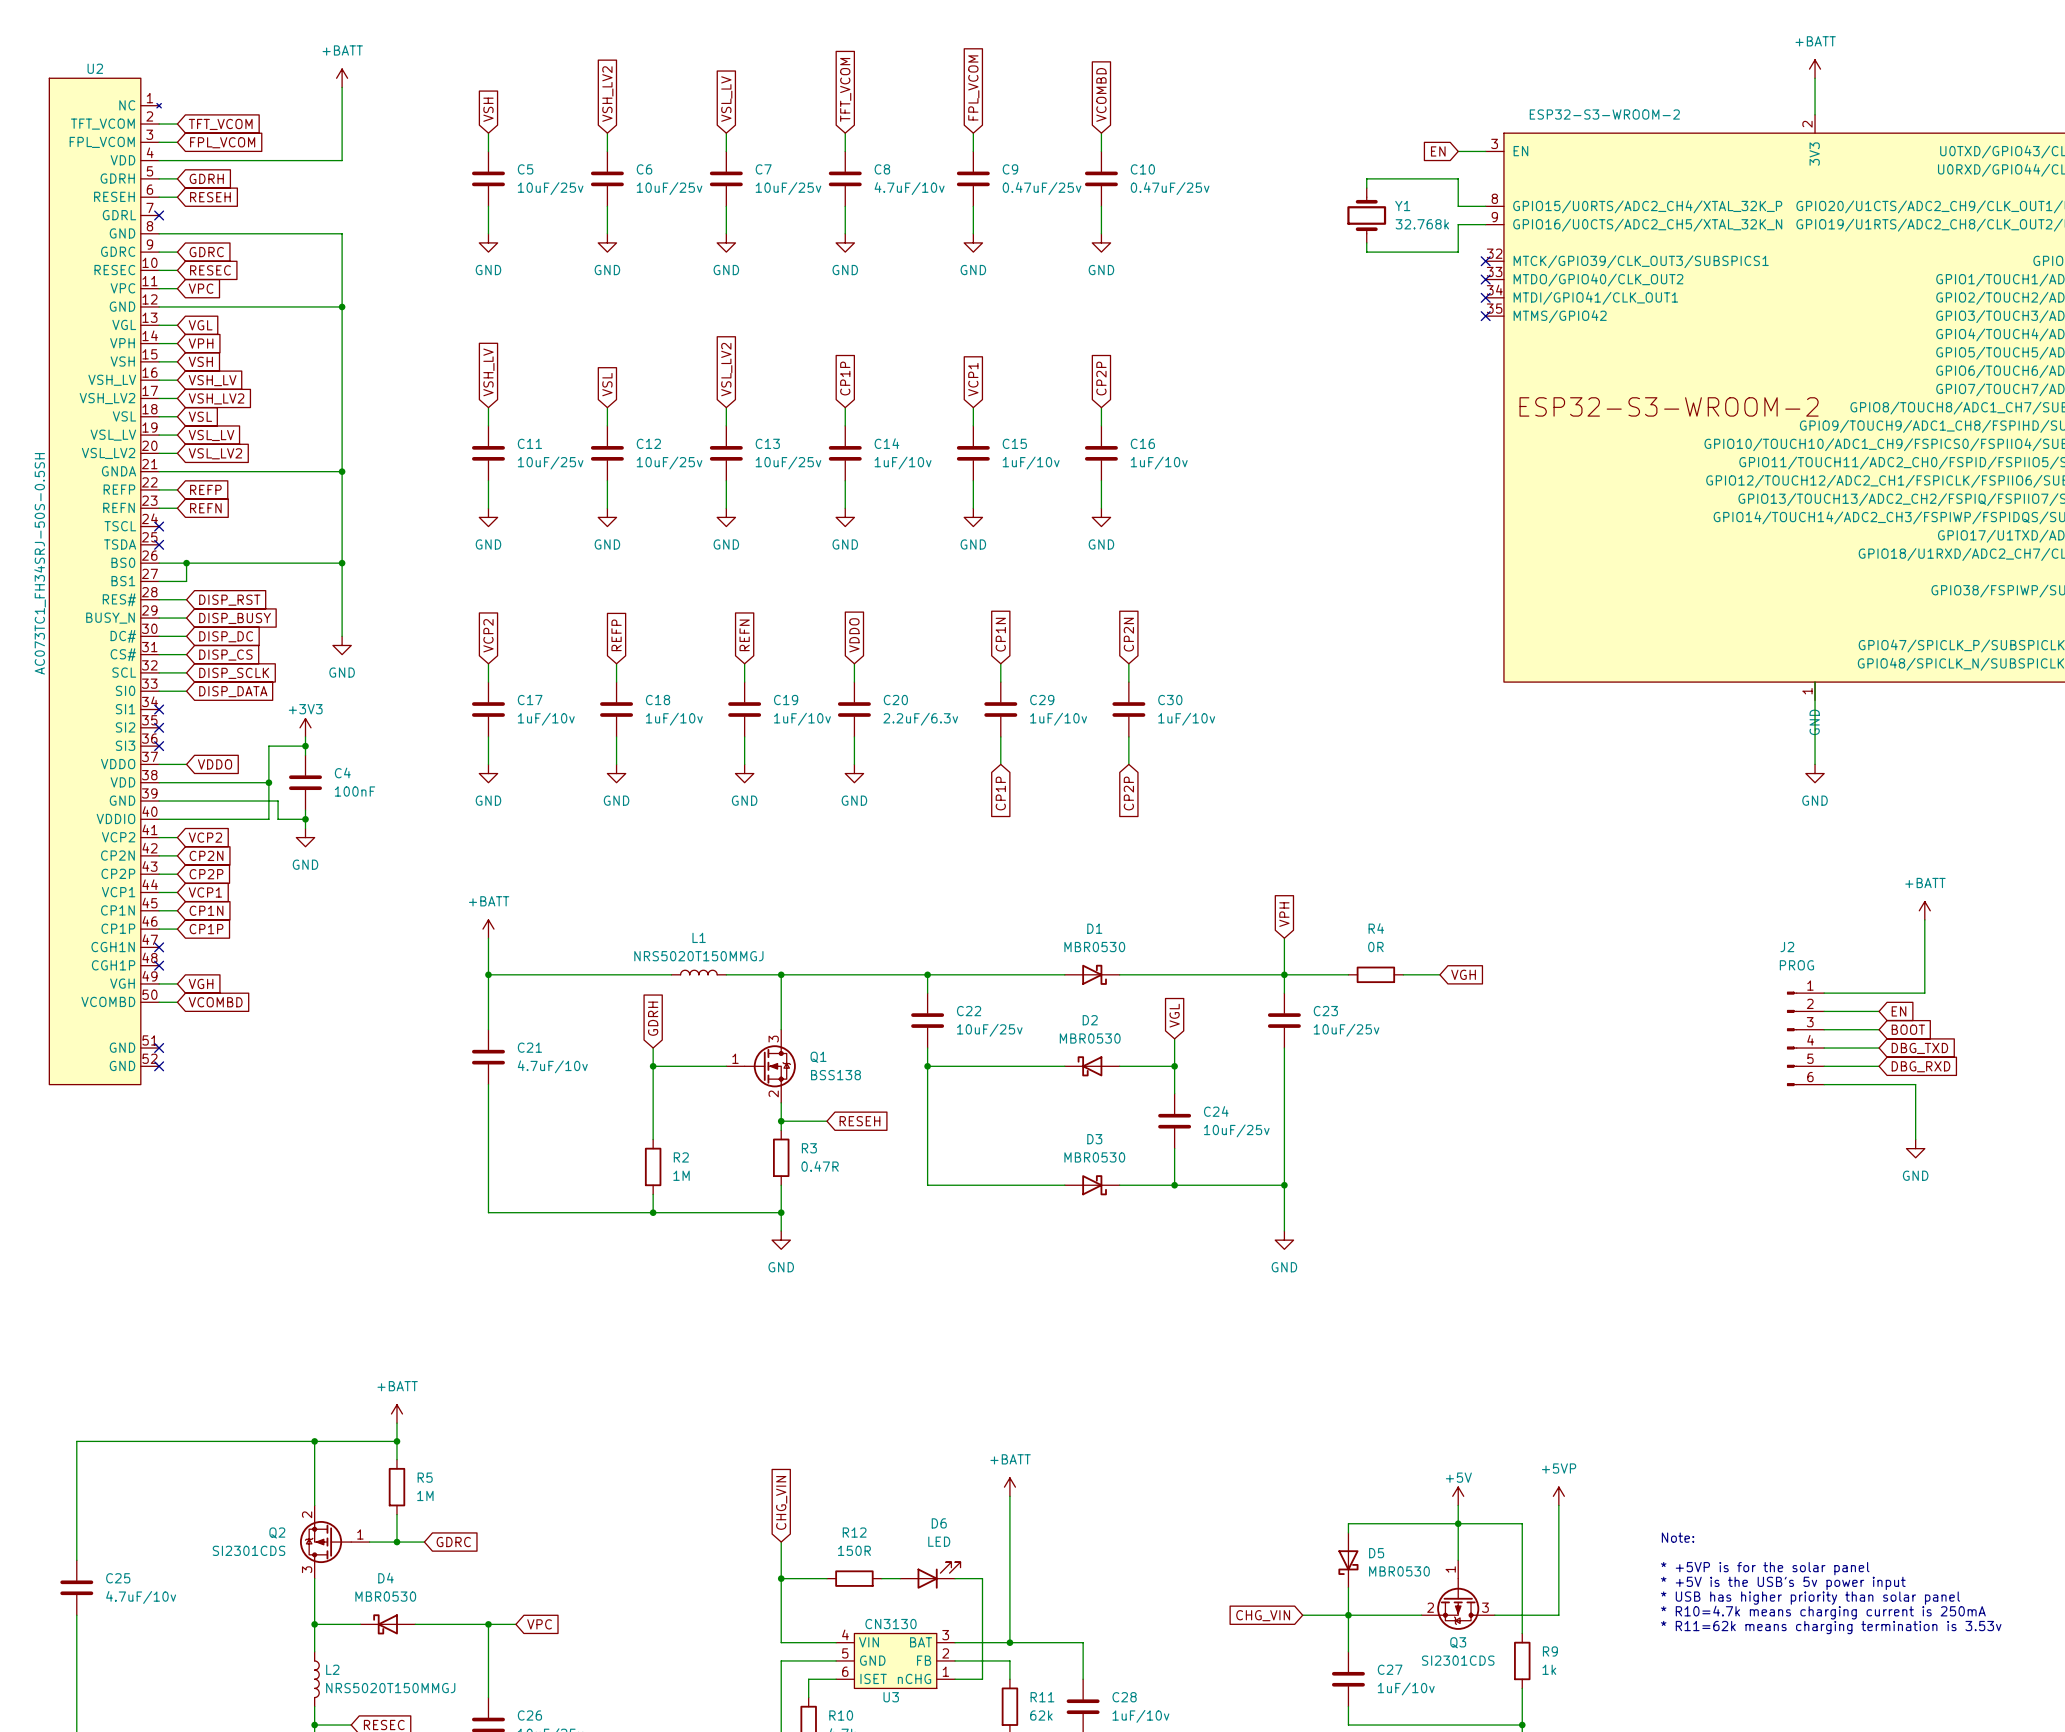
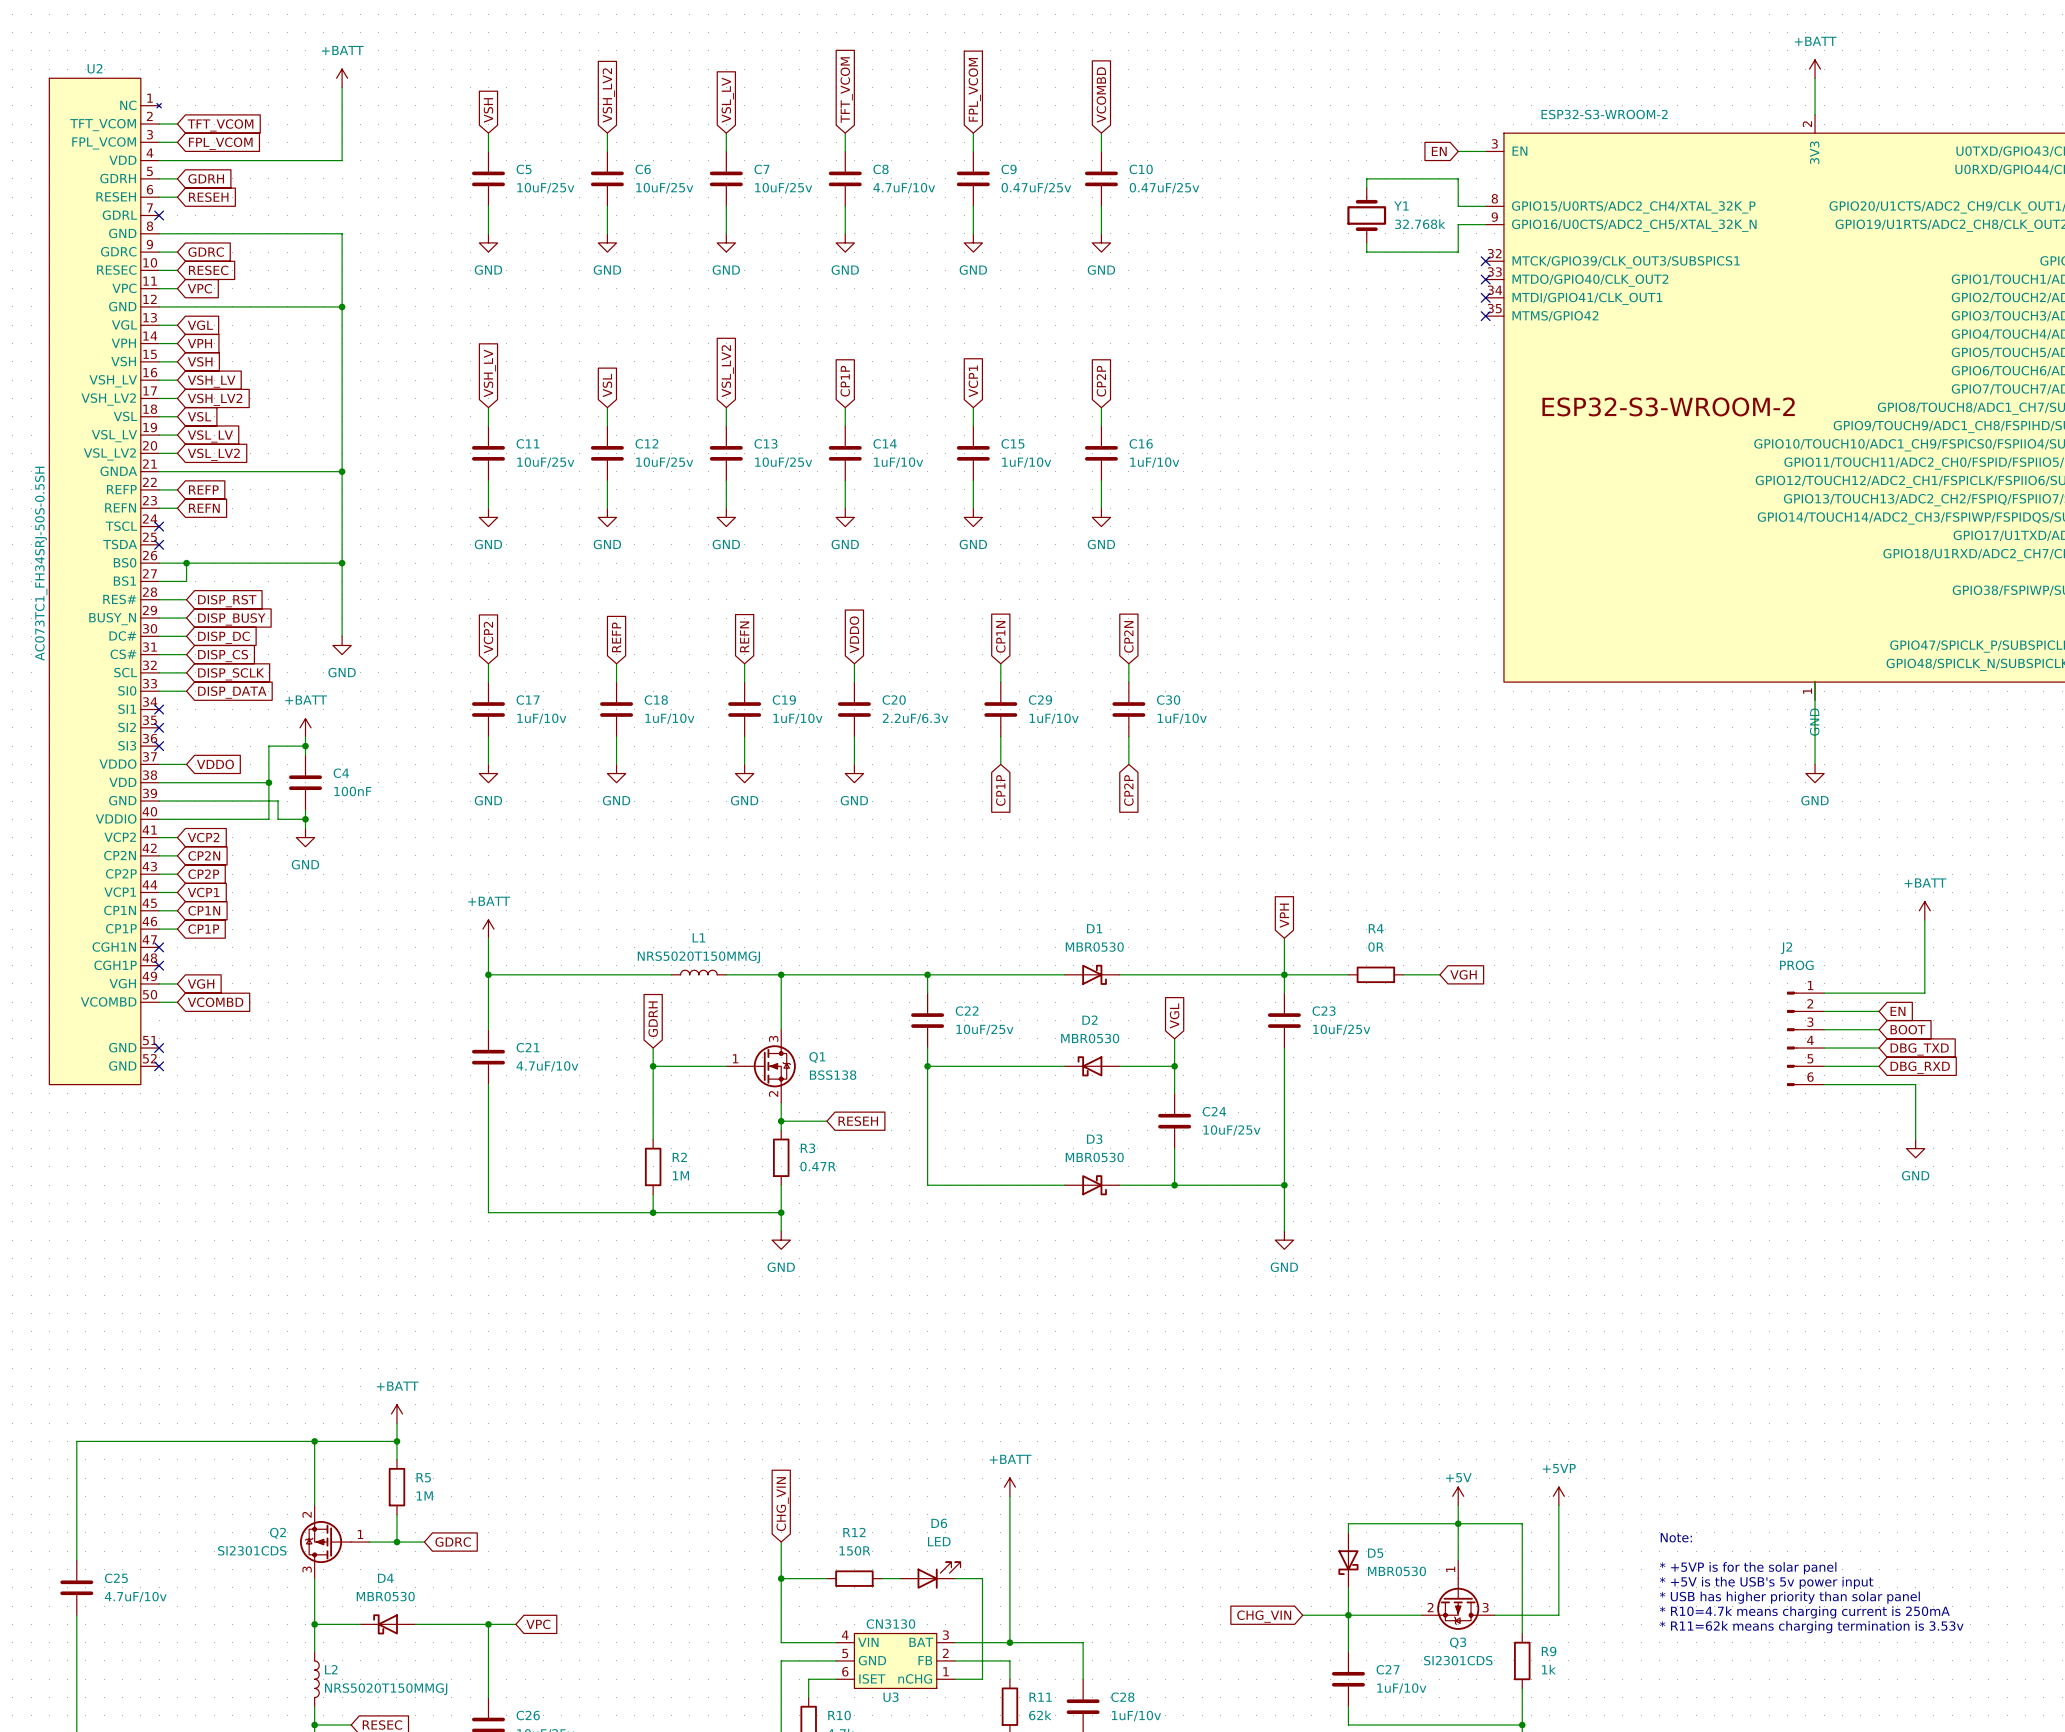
power symbol: +3V3 (305, 727) -> +BATT (305, 727)

